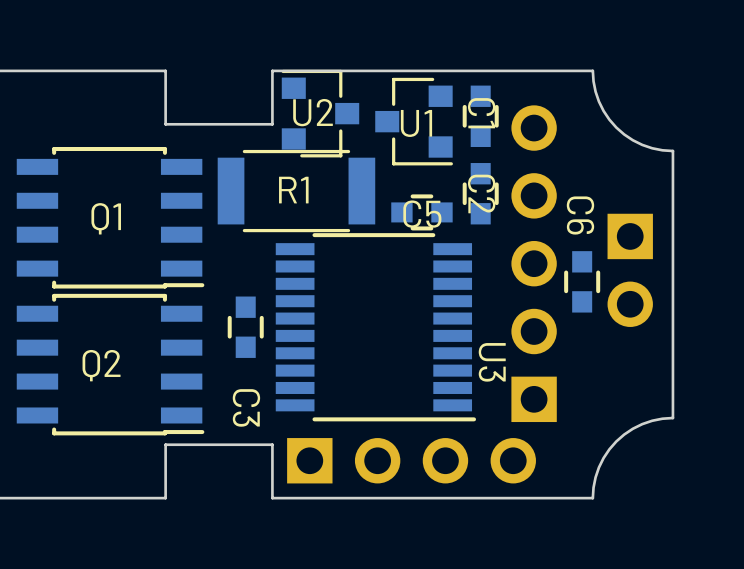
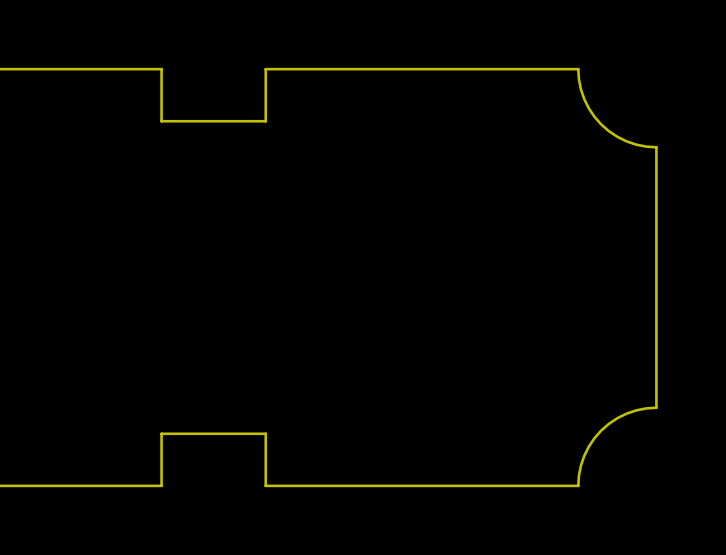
U2: (320, 113) -> none
C1: (480, 116) -> none
U1: (414, 121) -> none
R1: (296, 191) -> none
C2: (480, 193) -> none
C5: (421, 212) -> none
Q1: (110, 217) -> none
part: (534, 263) -> none
part: (630, 270) -> none
C6: (582, 281) -> none
C3: (245, 327) -> none
U3: (375, 327) -> none
Q2: (110, 364) -> none
part: (411, 460) -> none

